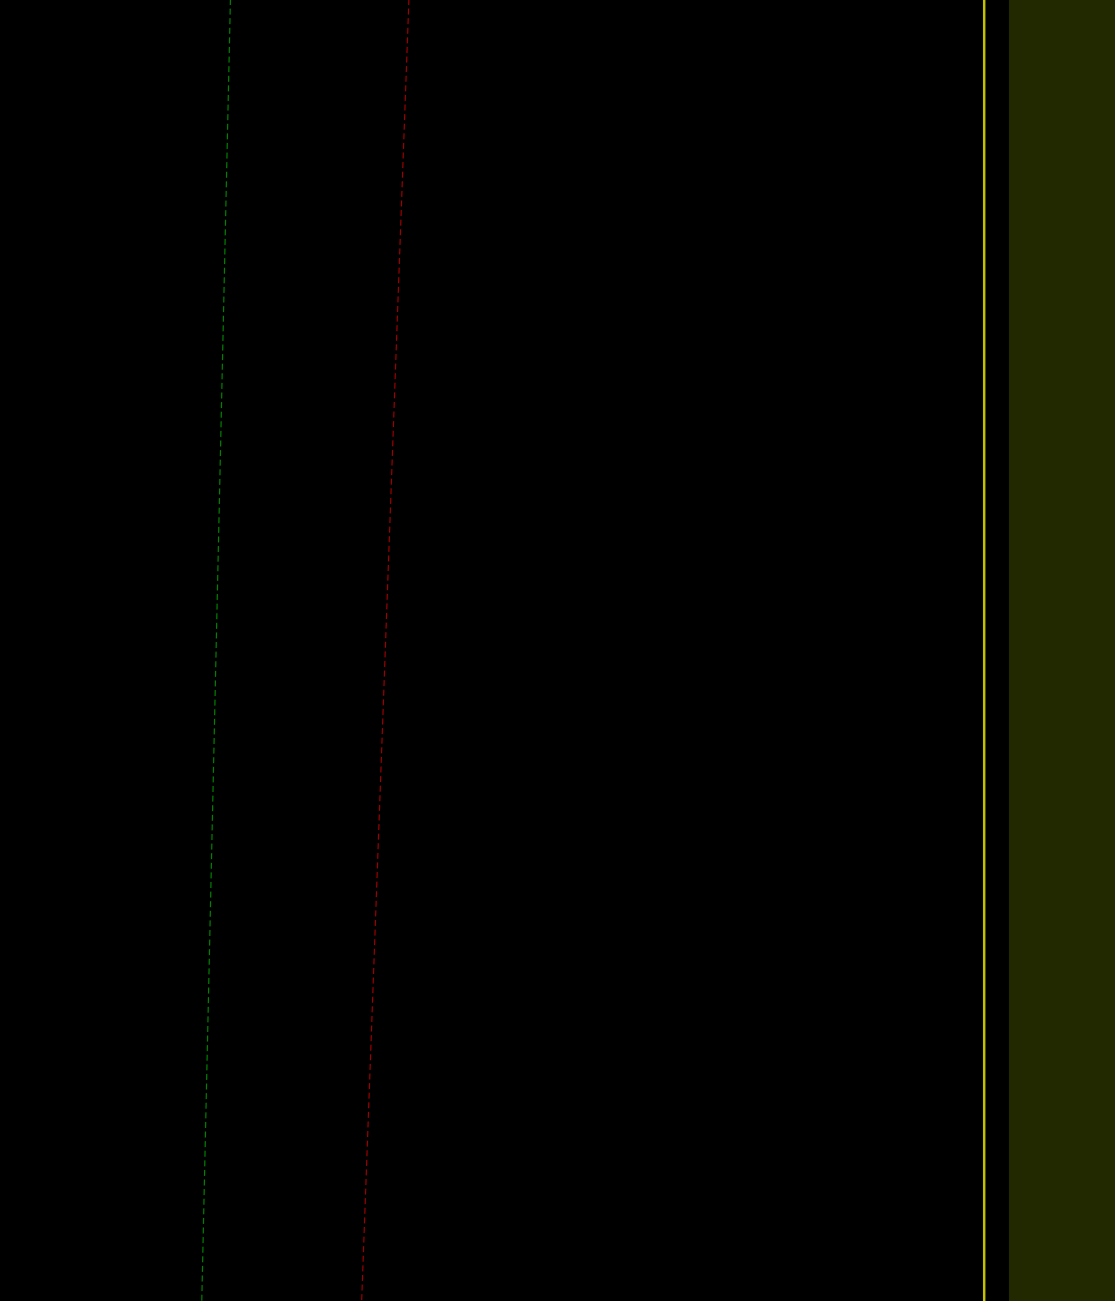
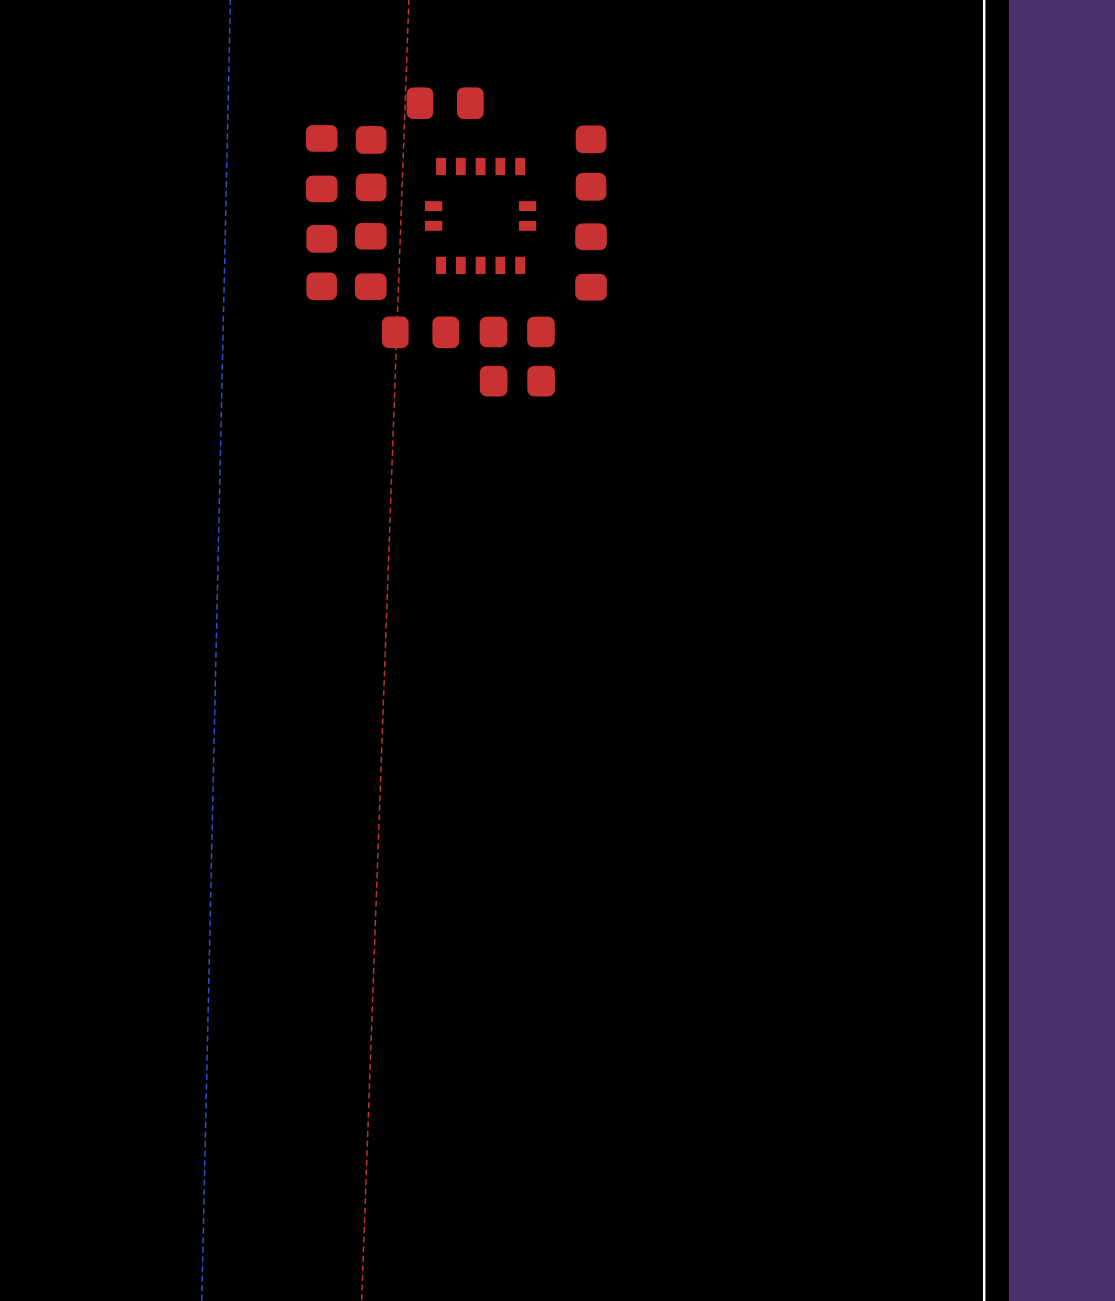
part: none -> (445, 103)
part: none -> (321, 163)
part: none -> (371, 163)
part: none -> (591, 163)
part: none -> (480, 215)
part: none -> (370, 261)
part: none -> (591, 261)
part: none -> (321, 262)
part: none -> (517, 331)
part: none -> (420, 332)
part: none -> (517, 381)

